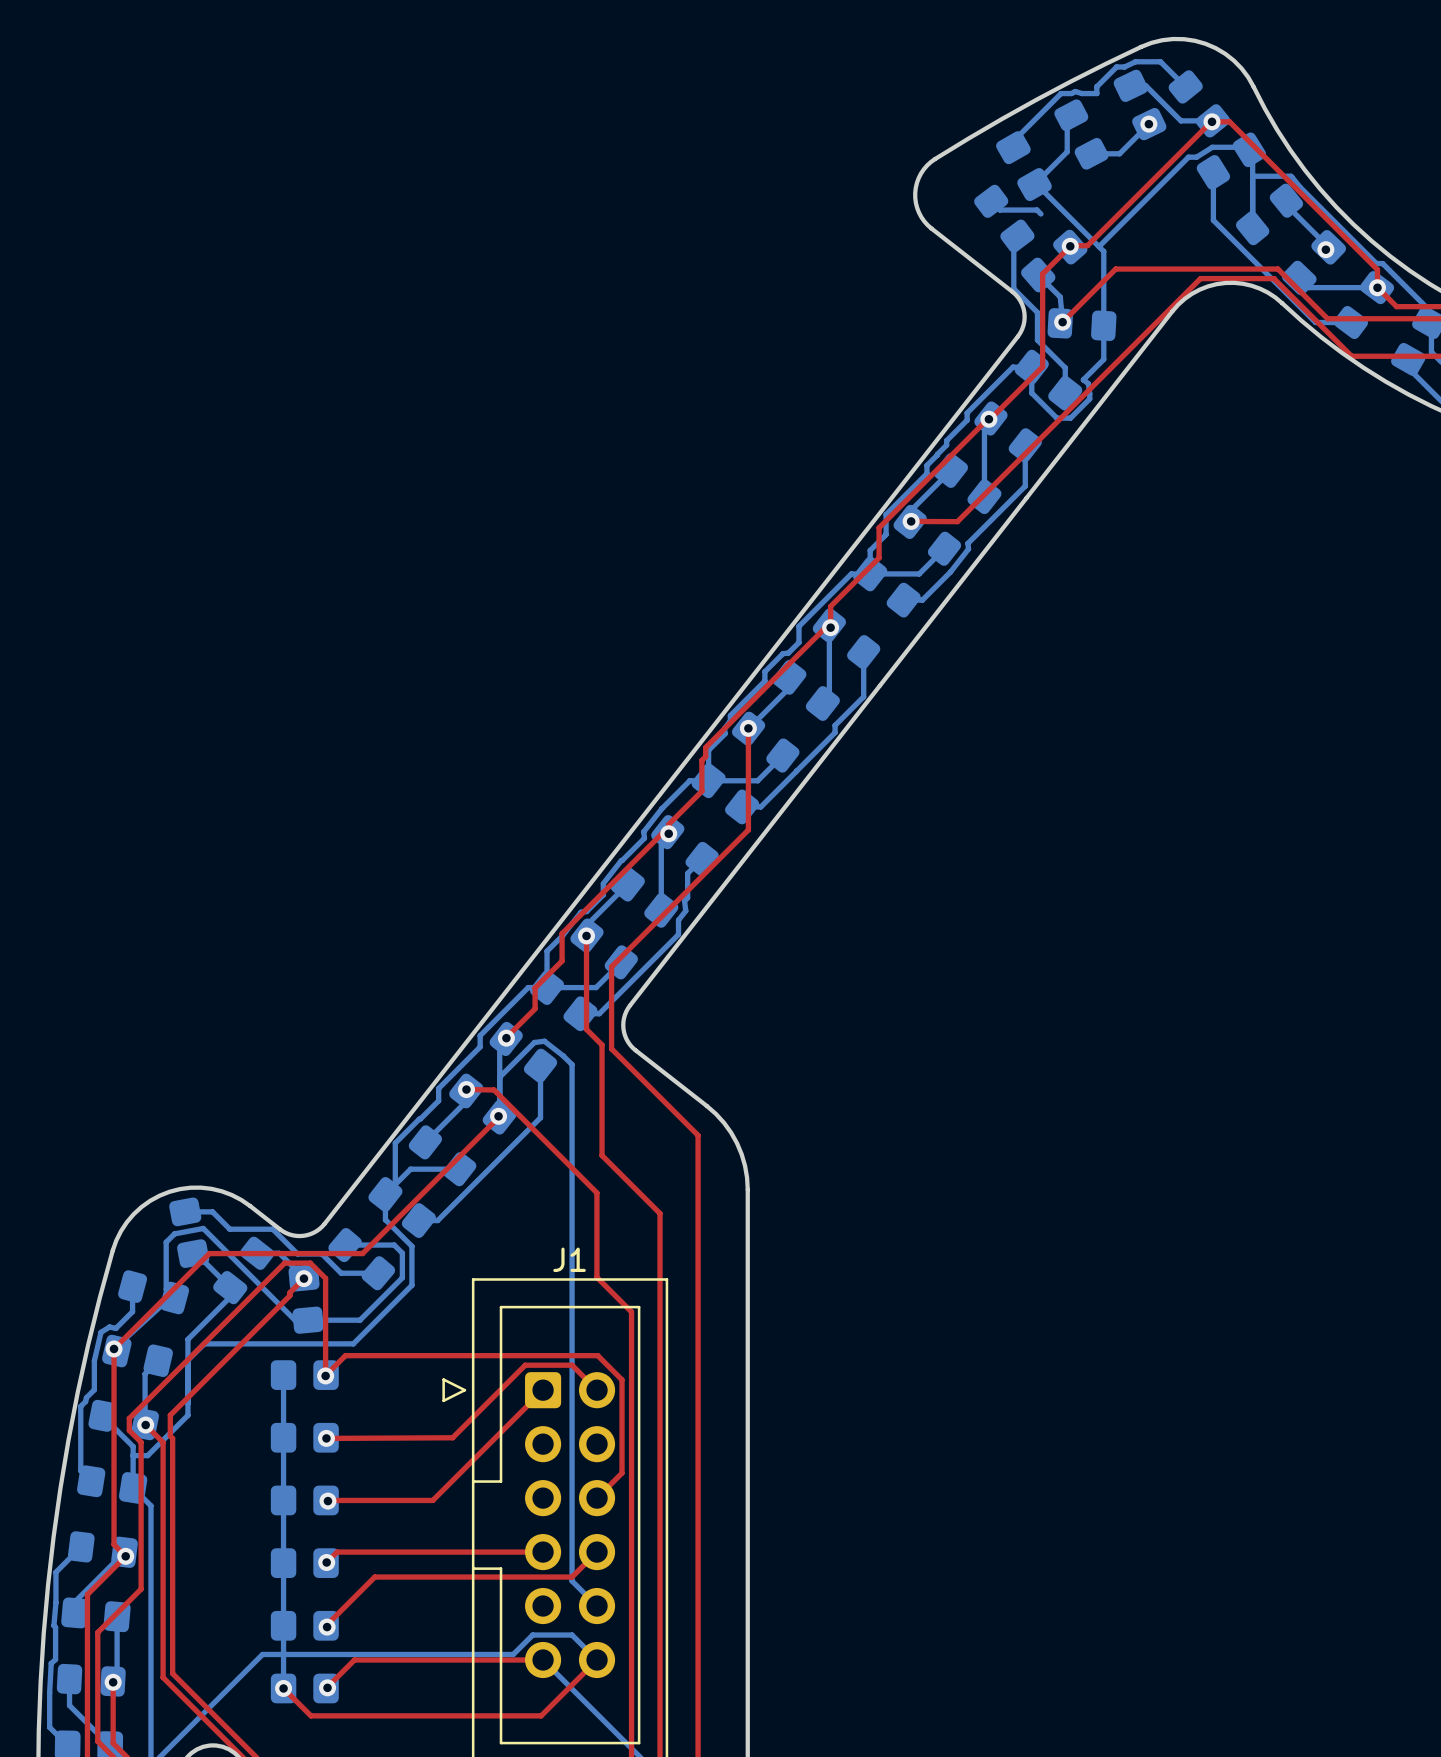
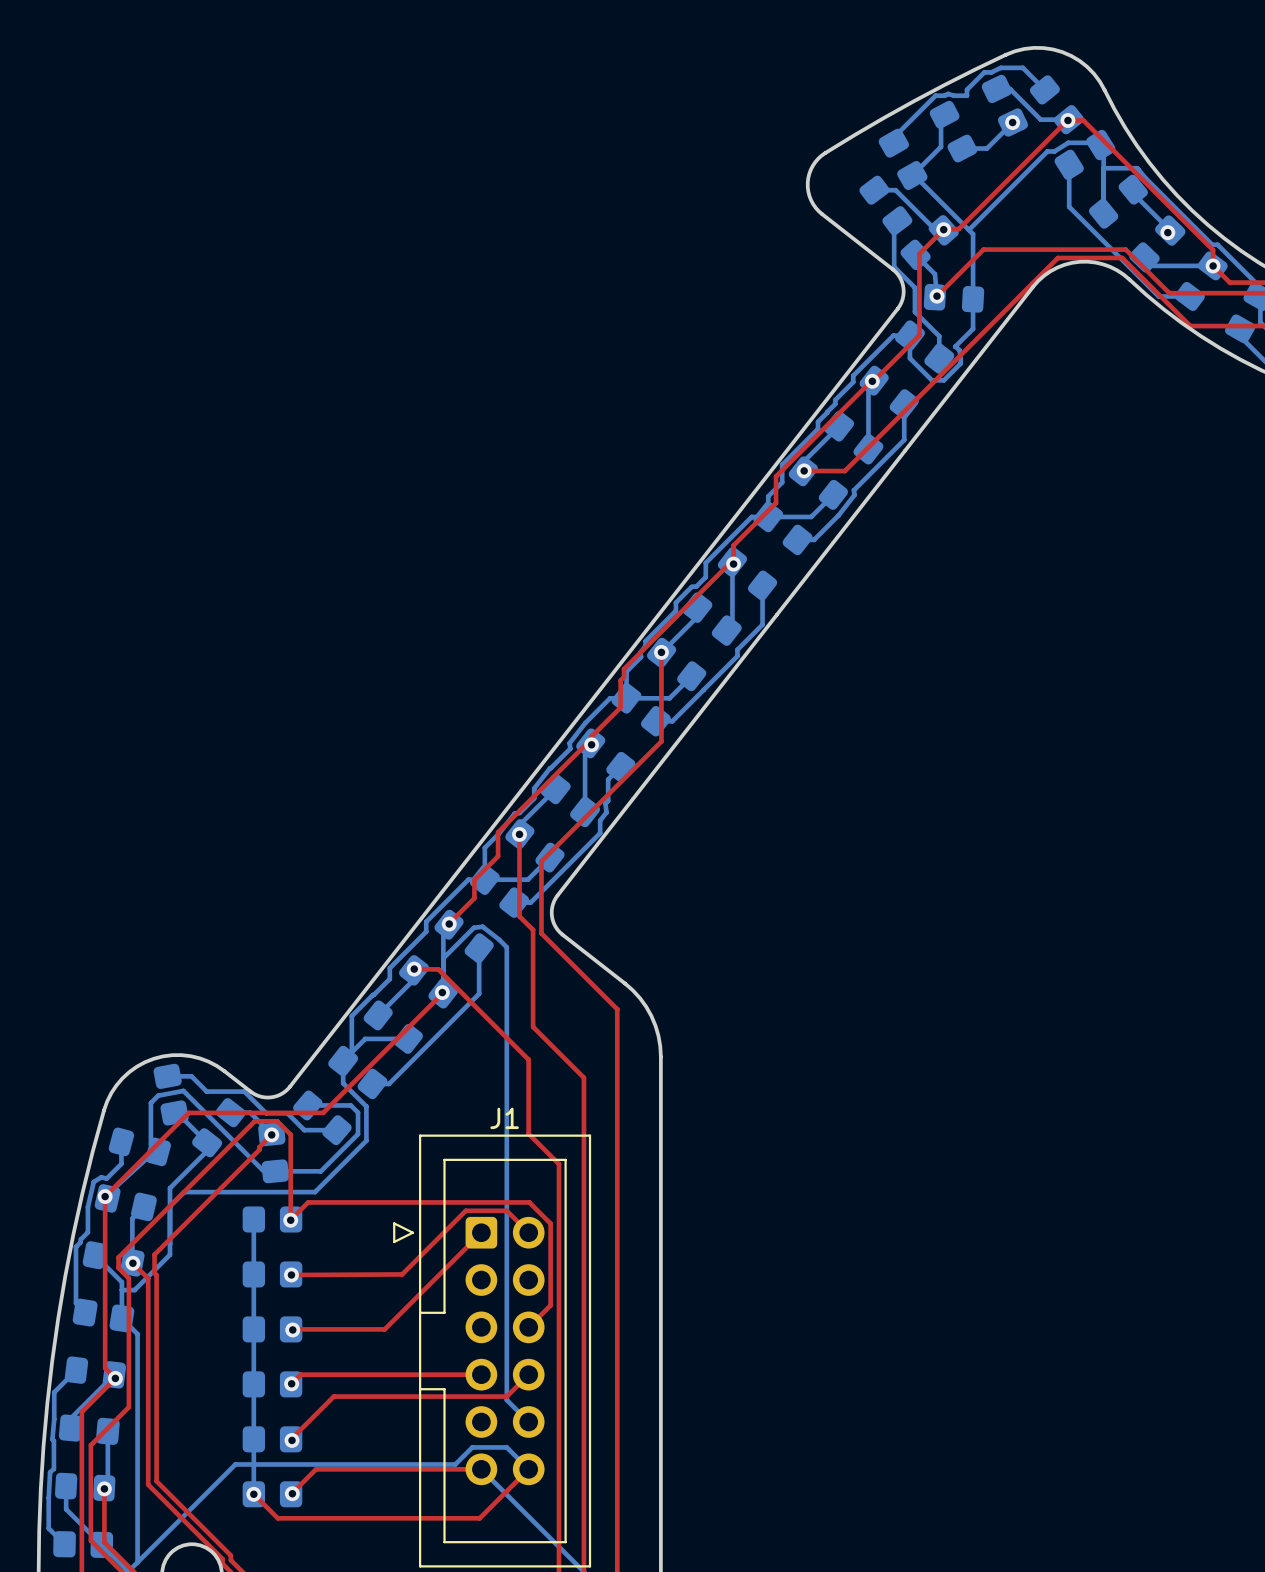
bottom track: (991, 201) (999, 210) (1036, 210) (1040, 214) -> (874, 190) (895, 190) (935, 230)

